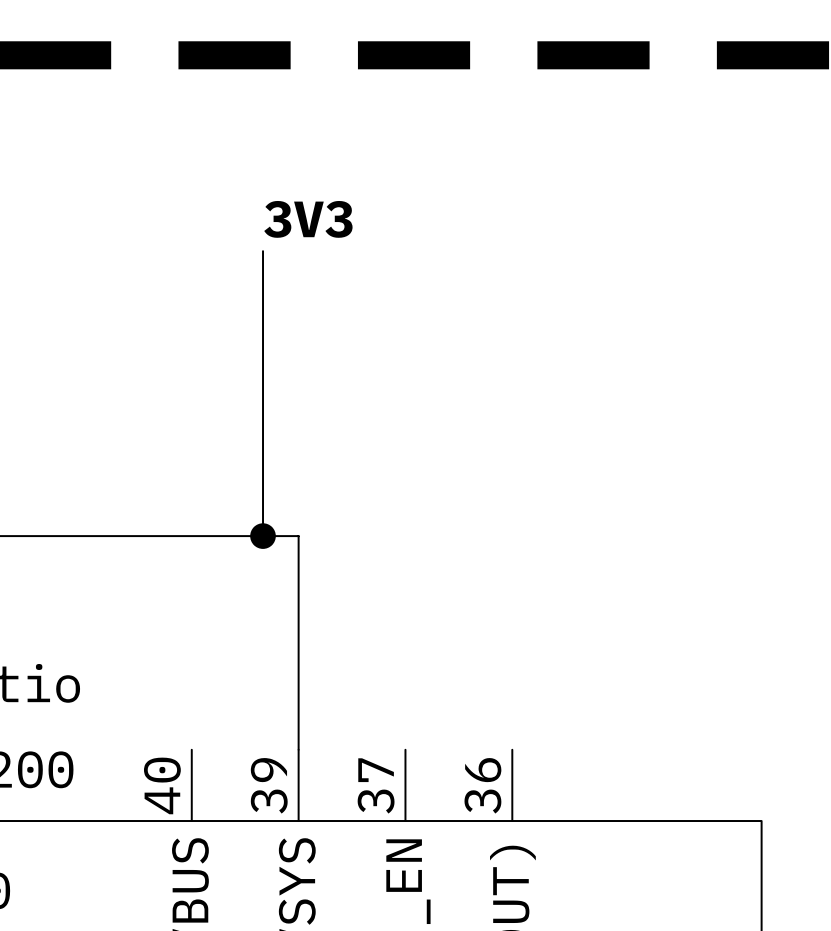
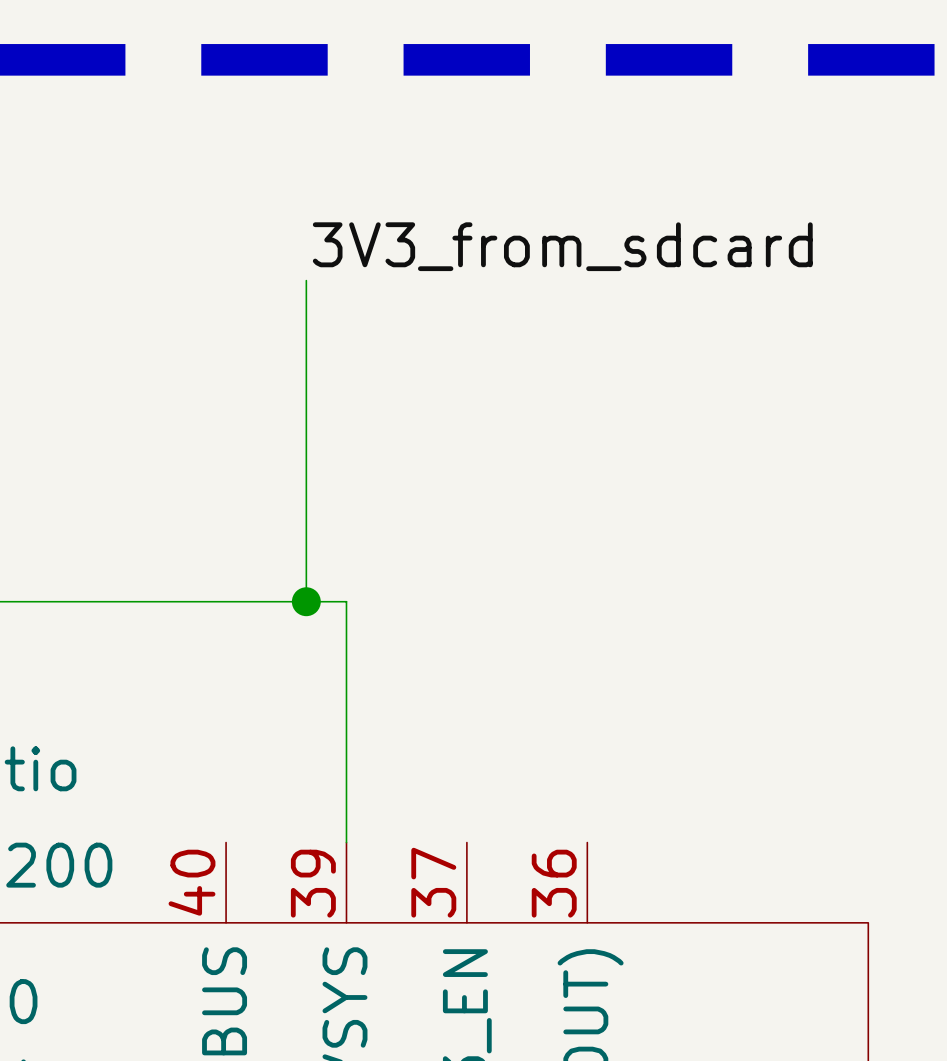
label: 3V3 (308, 219) -> 3V3_from_sdcard (562, 246)

